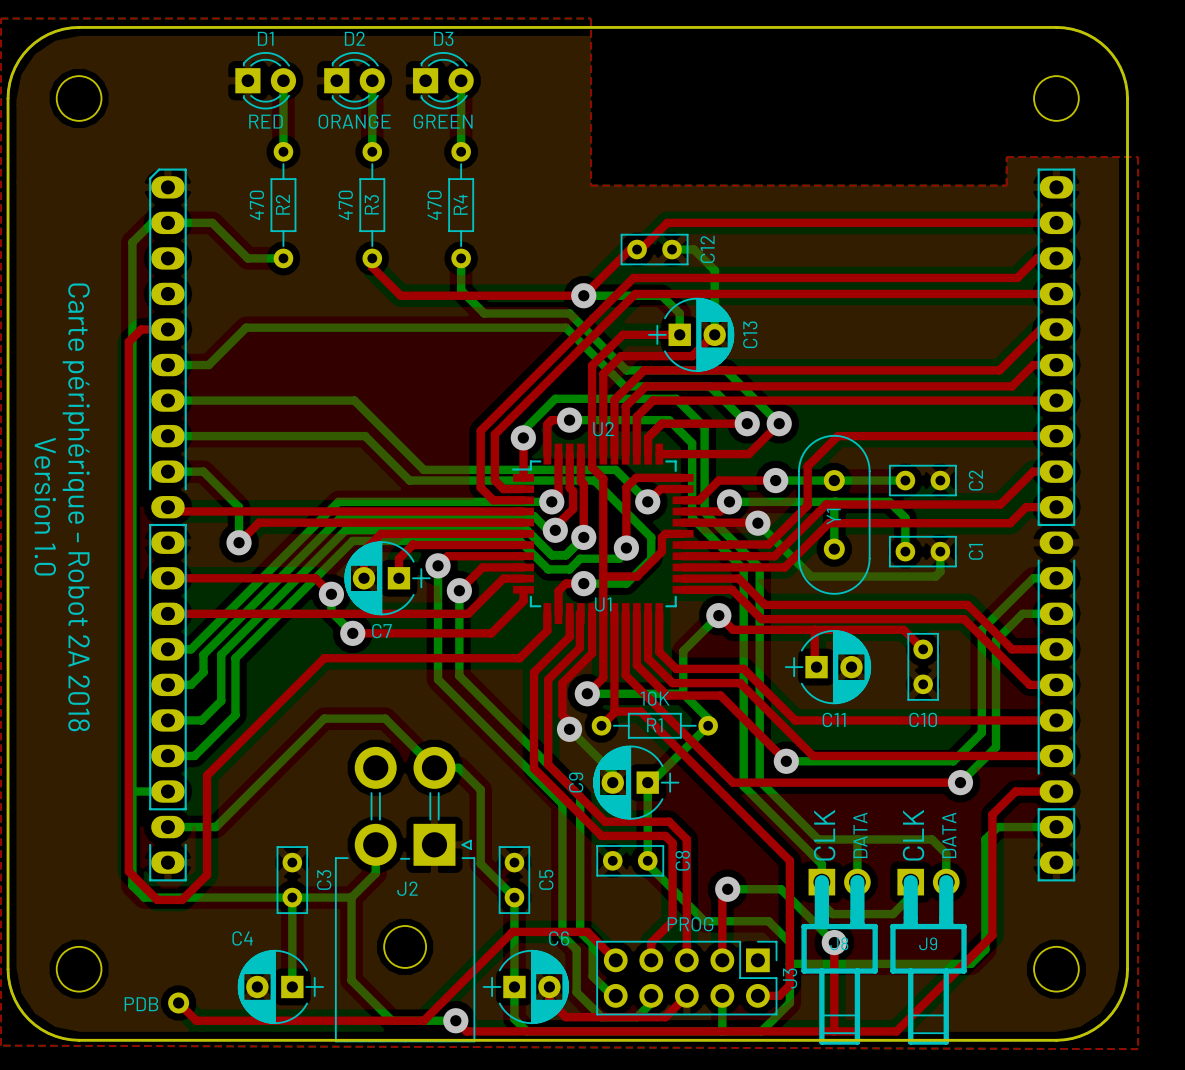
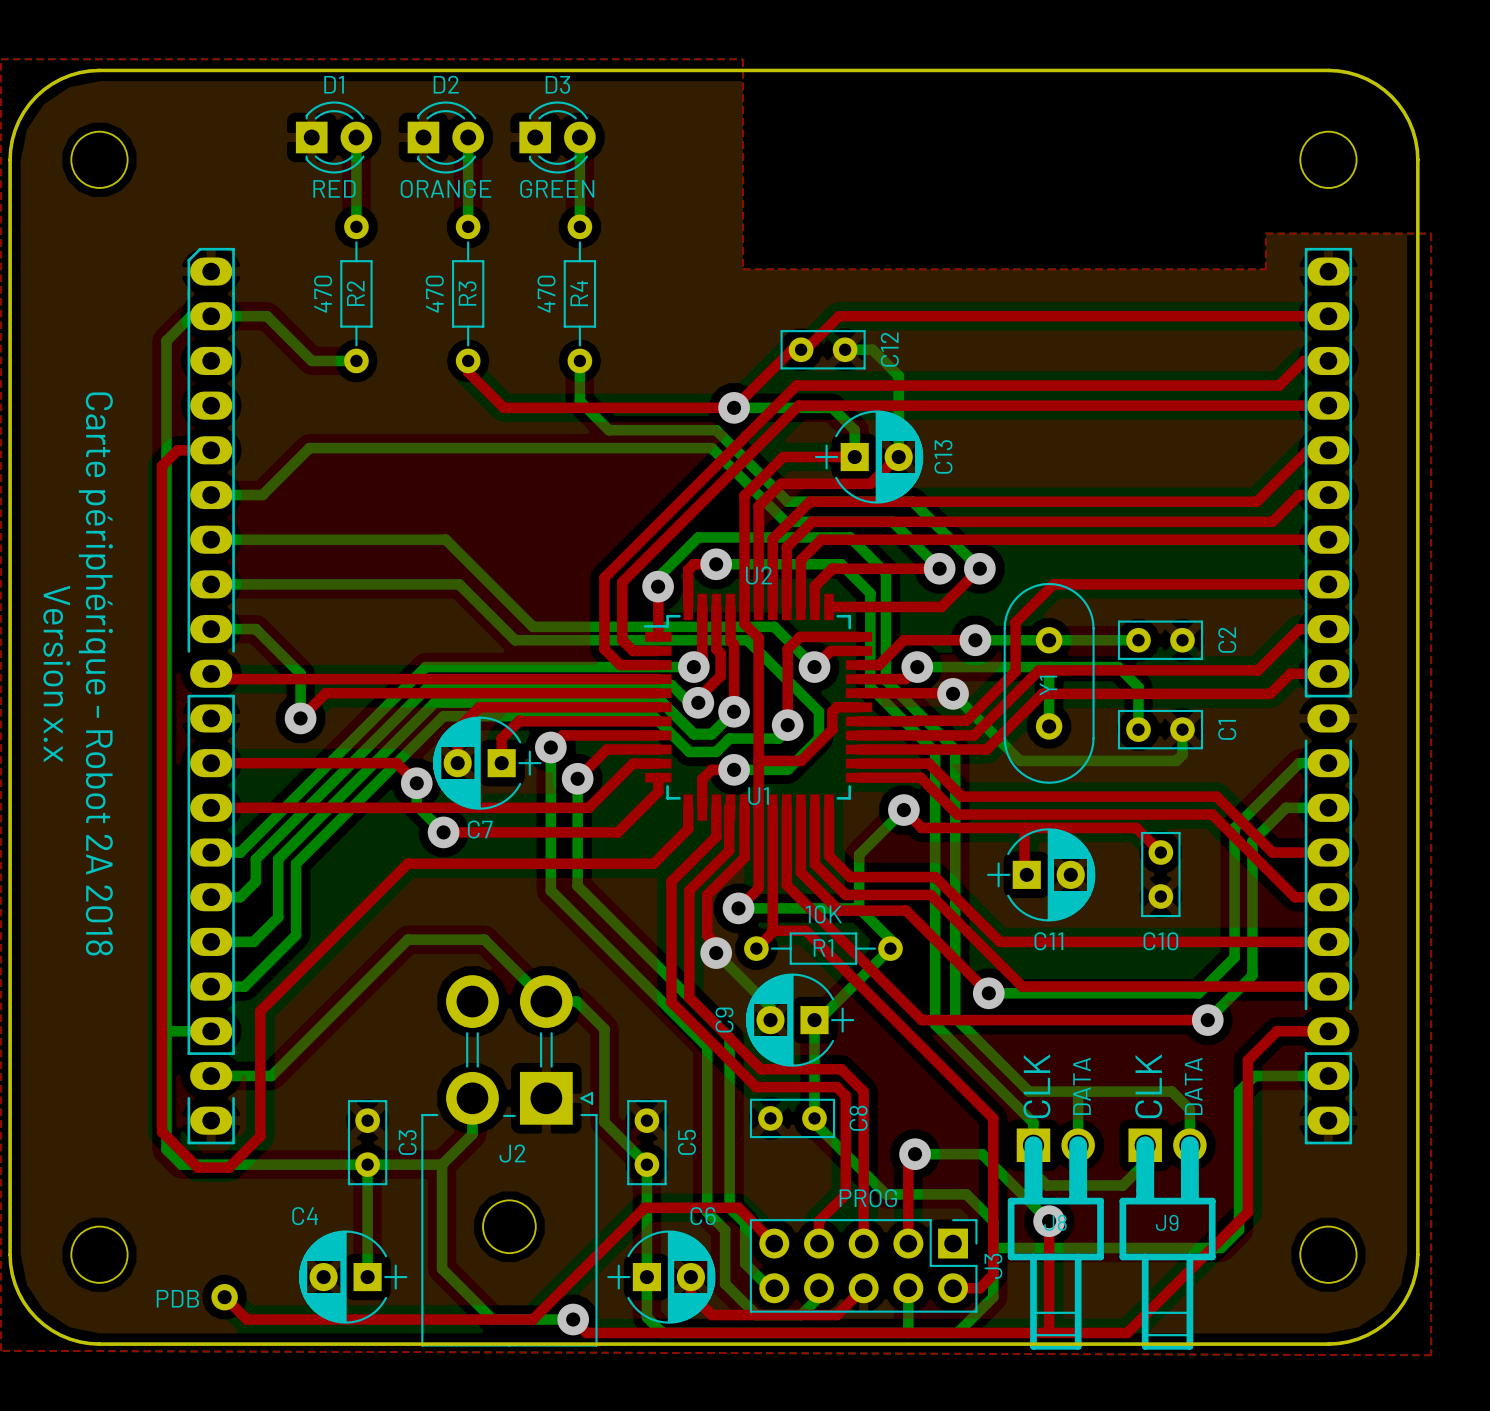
text: Version 1.0 (45, 506) -> Version x.x (56, 673)

